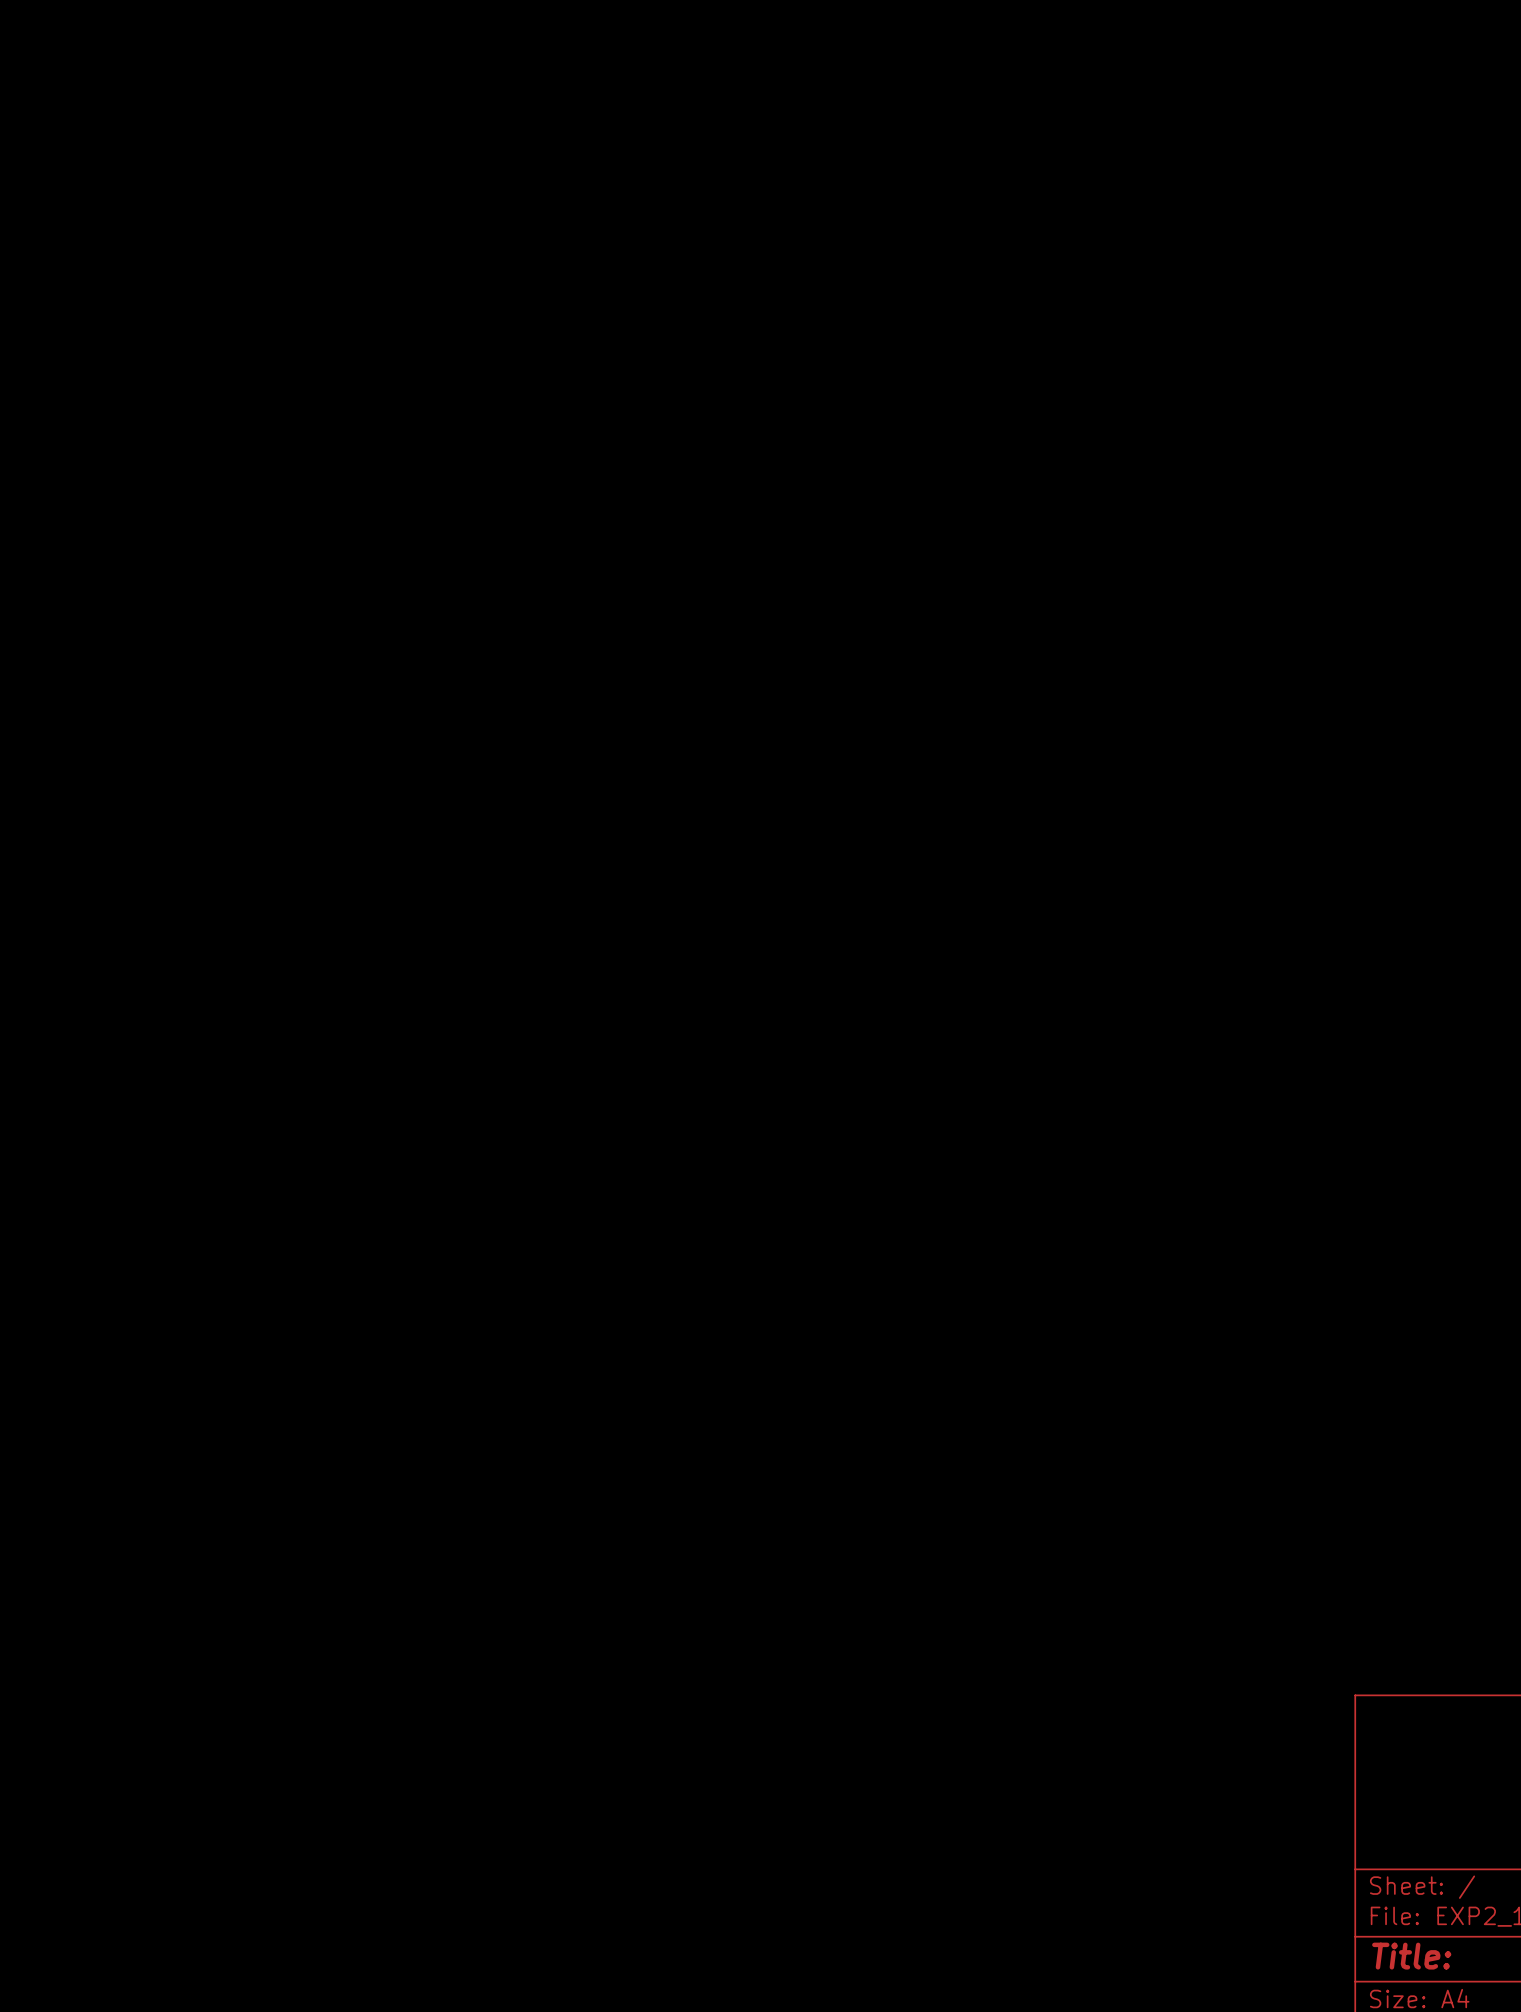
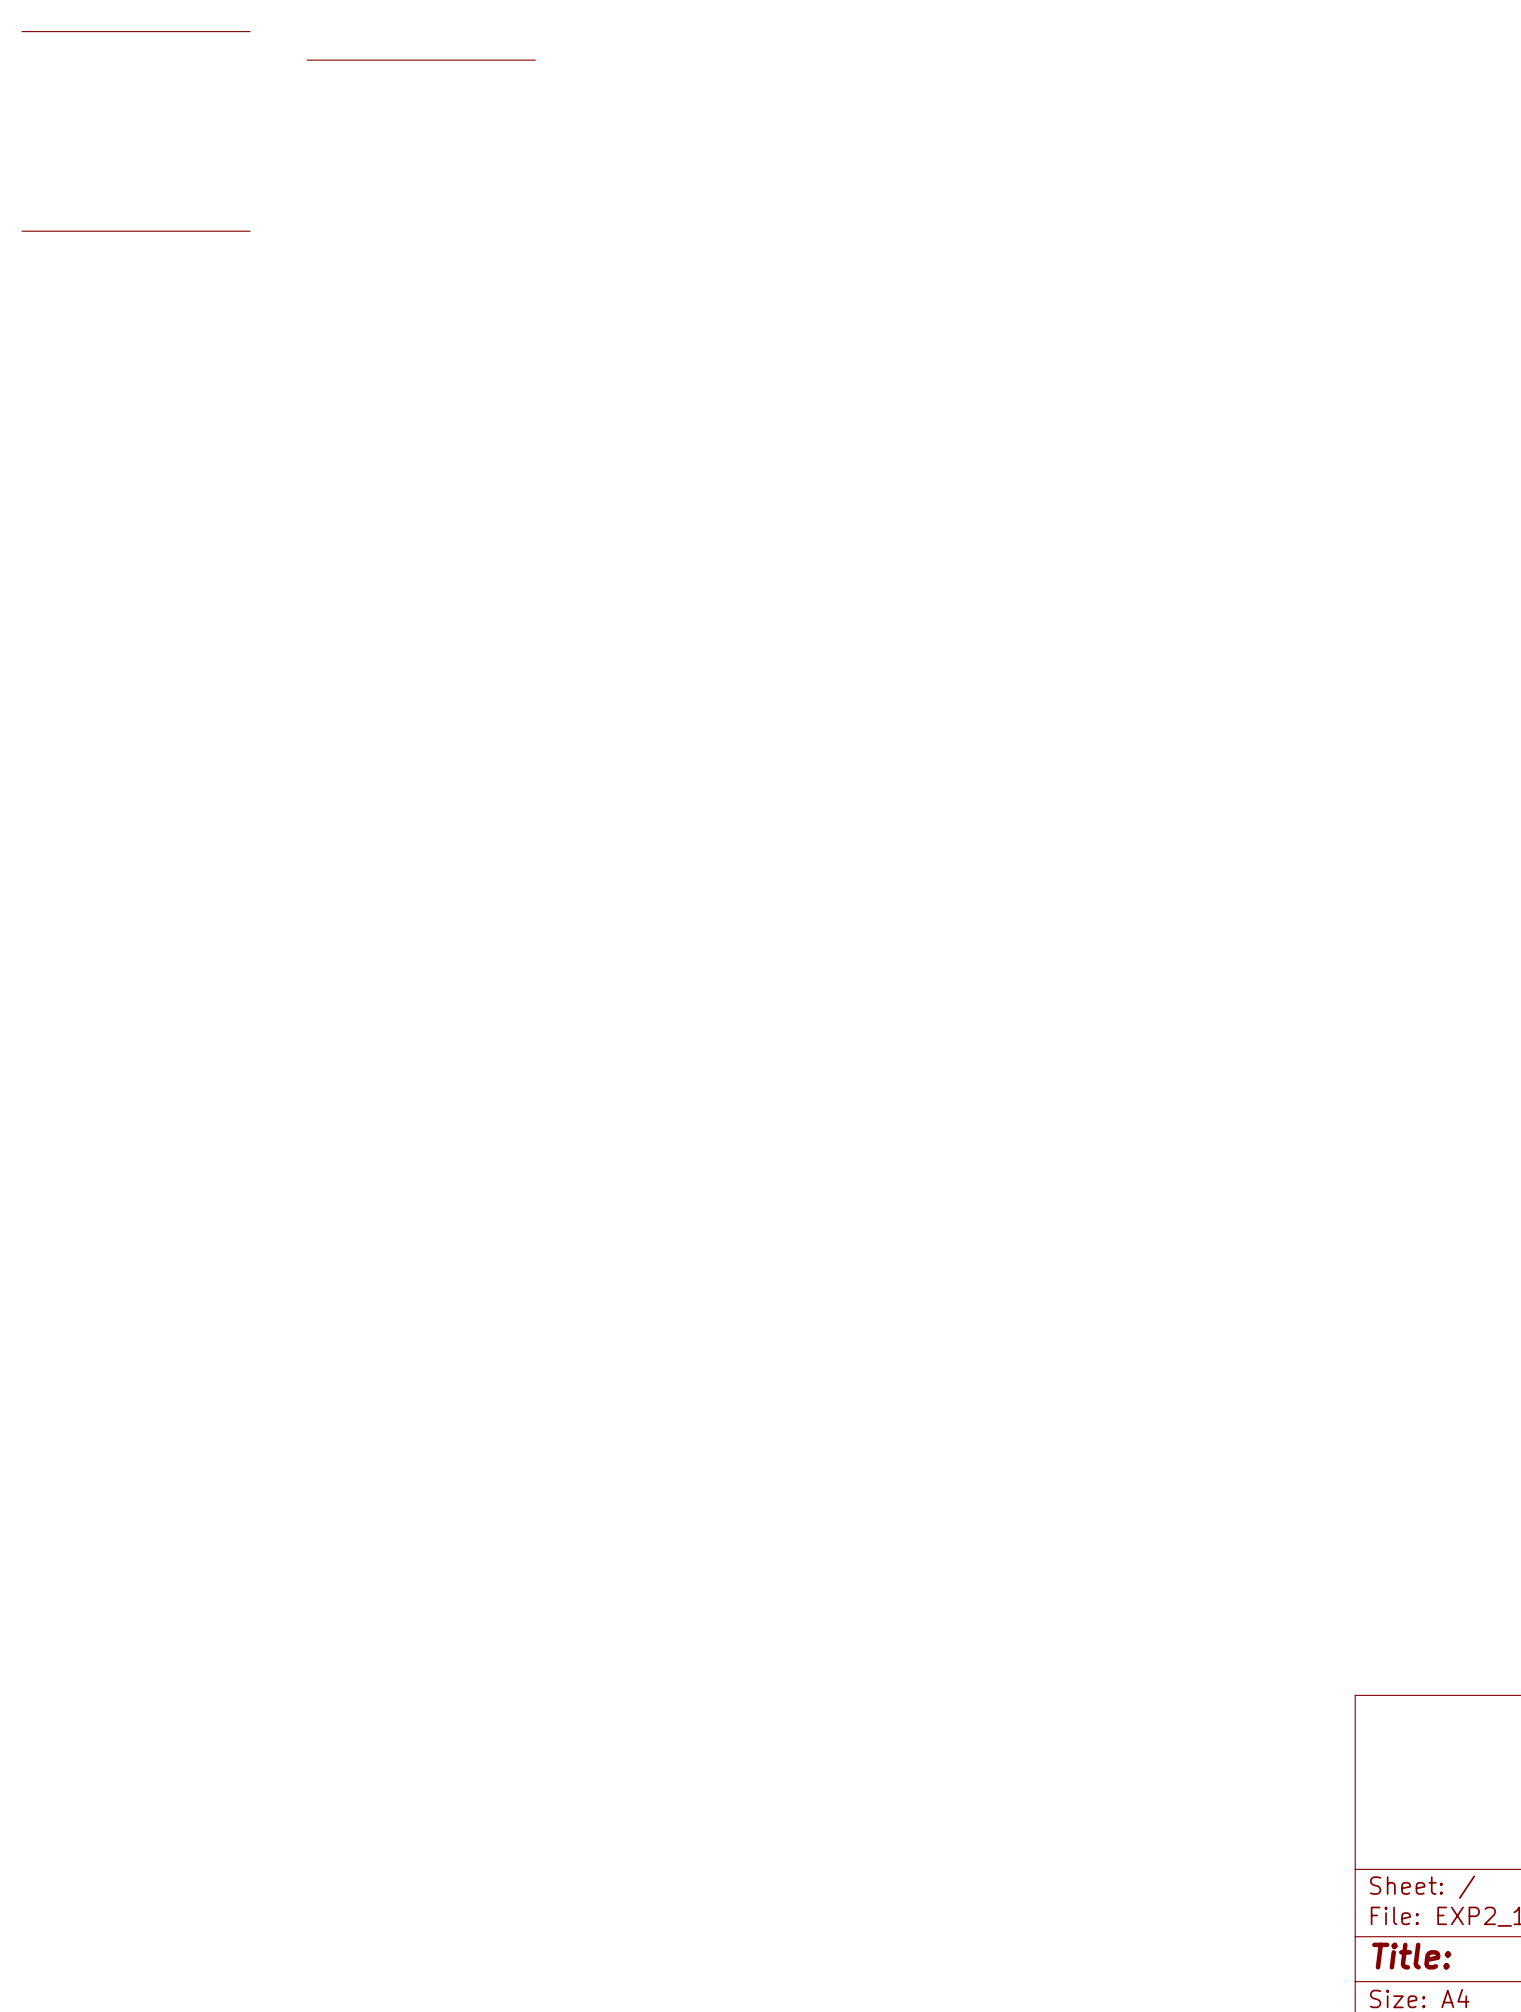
part: none -> (136, 31)
part: none -> (421, 60)
part: none -> (136, 231)

